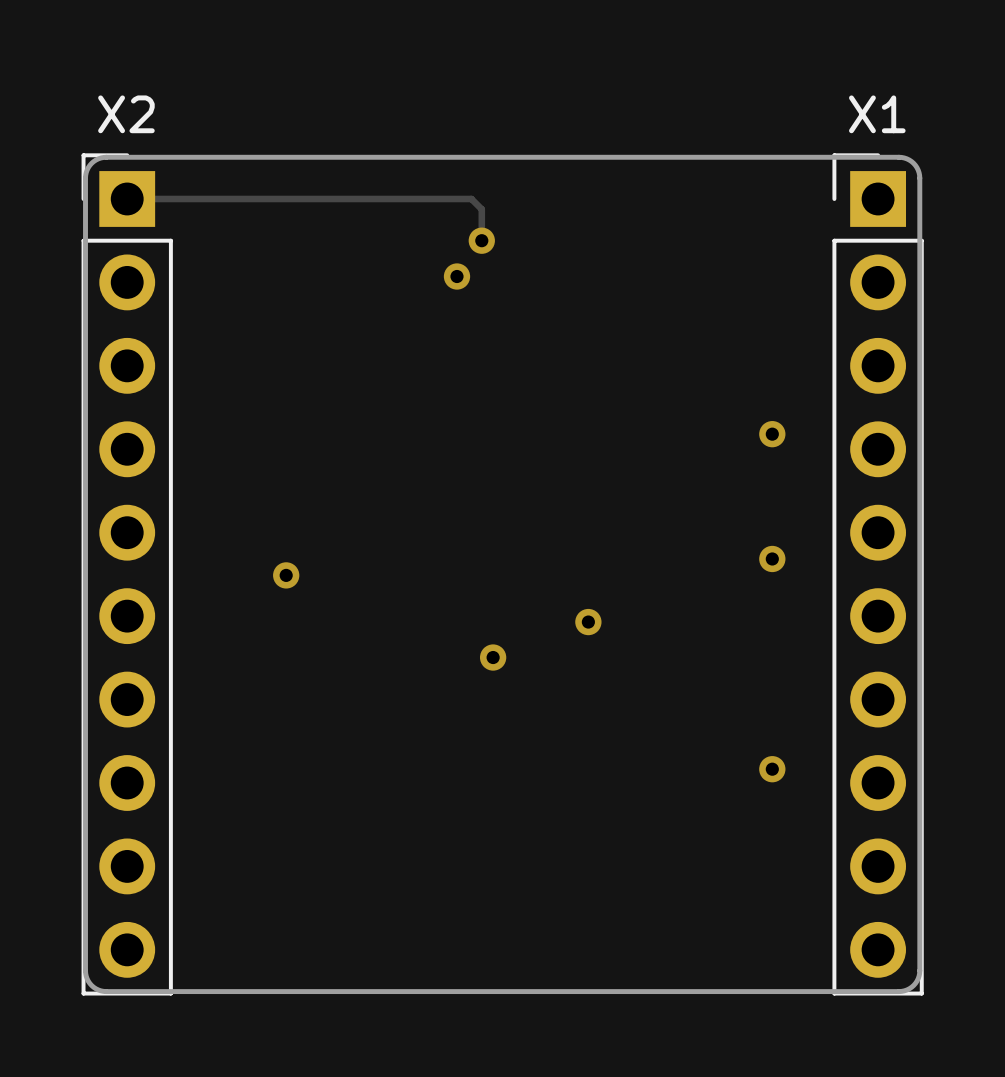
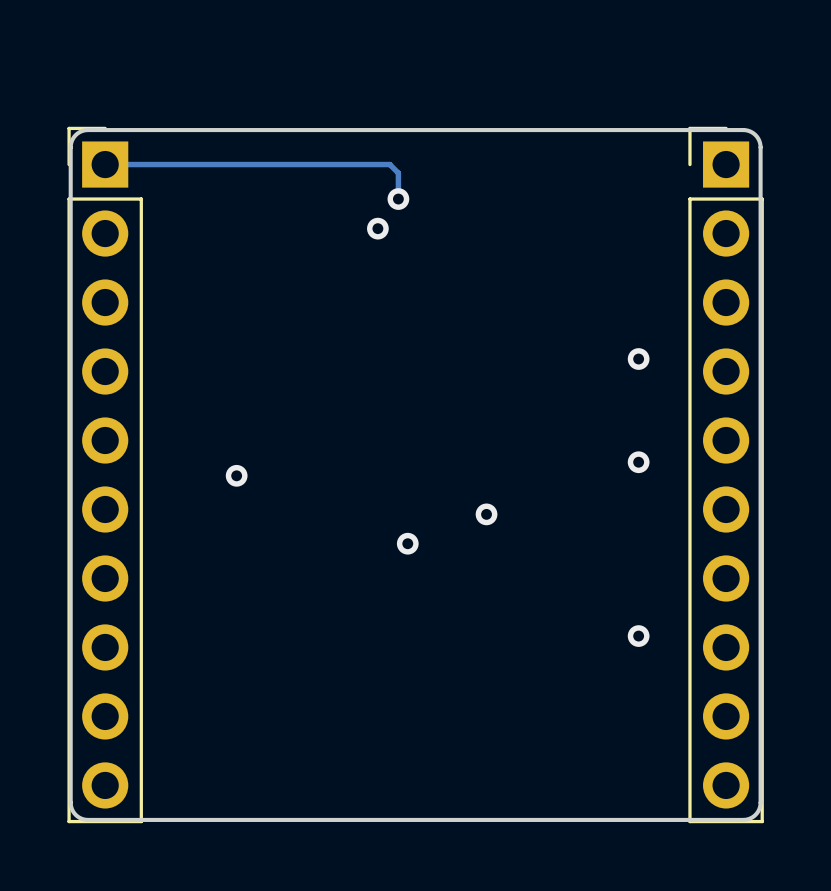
X2 name: X2 (126, 114) -> none
X1 name: X1 (877, 114) -> none

